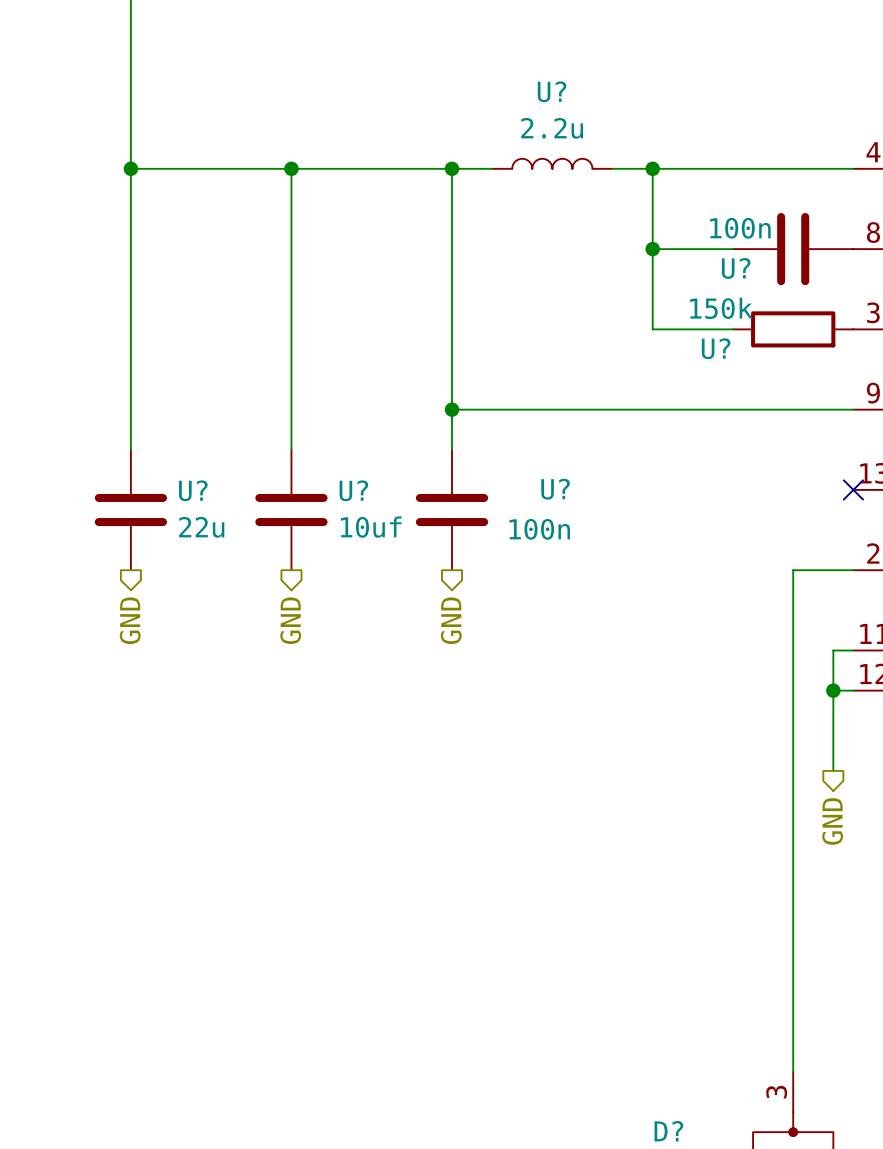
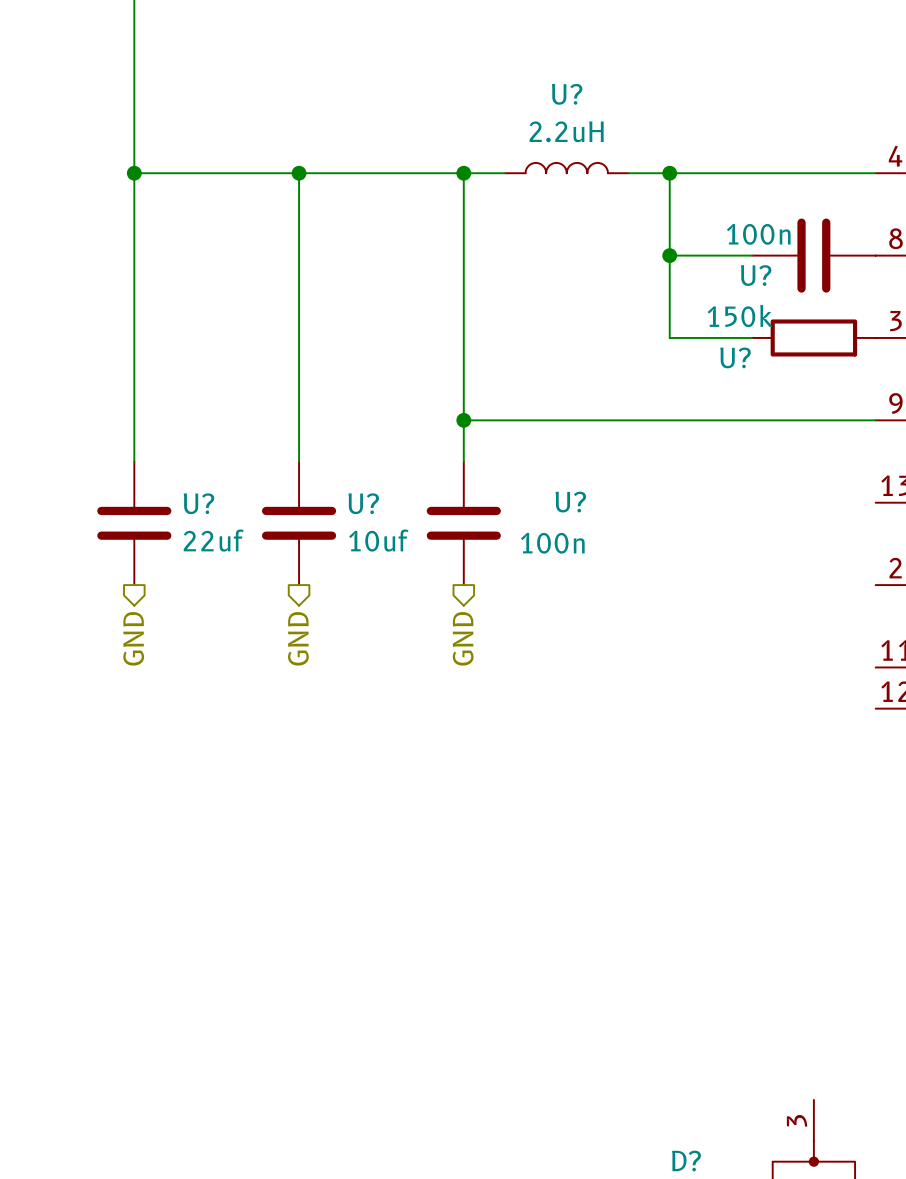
U? value: 2.2u (552, 128) -> 2.2uH (566, 131)
no-connect mark: (853, 489) -> none
U? value: 22u (201, 527) -> 22uf (213, 540)
wire: (853, 570) (793, 570) (793, 1071) -> none
wire: (853, 650) (833, 650) (833, 770) -> none
wire: (833, 690) (853, 690) -> none
junction: (833, 690) -> none
hierarchical label: GND (832, 821) -> none

